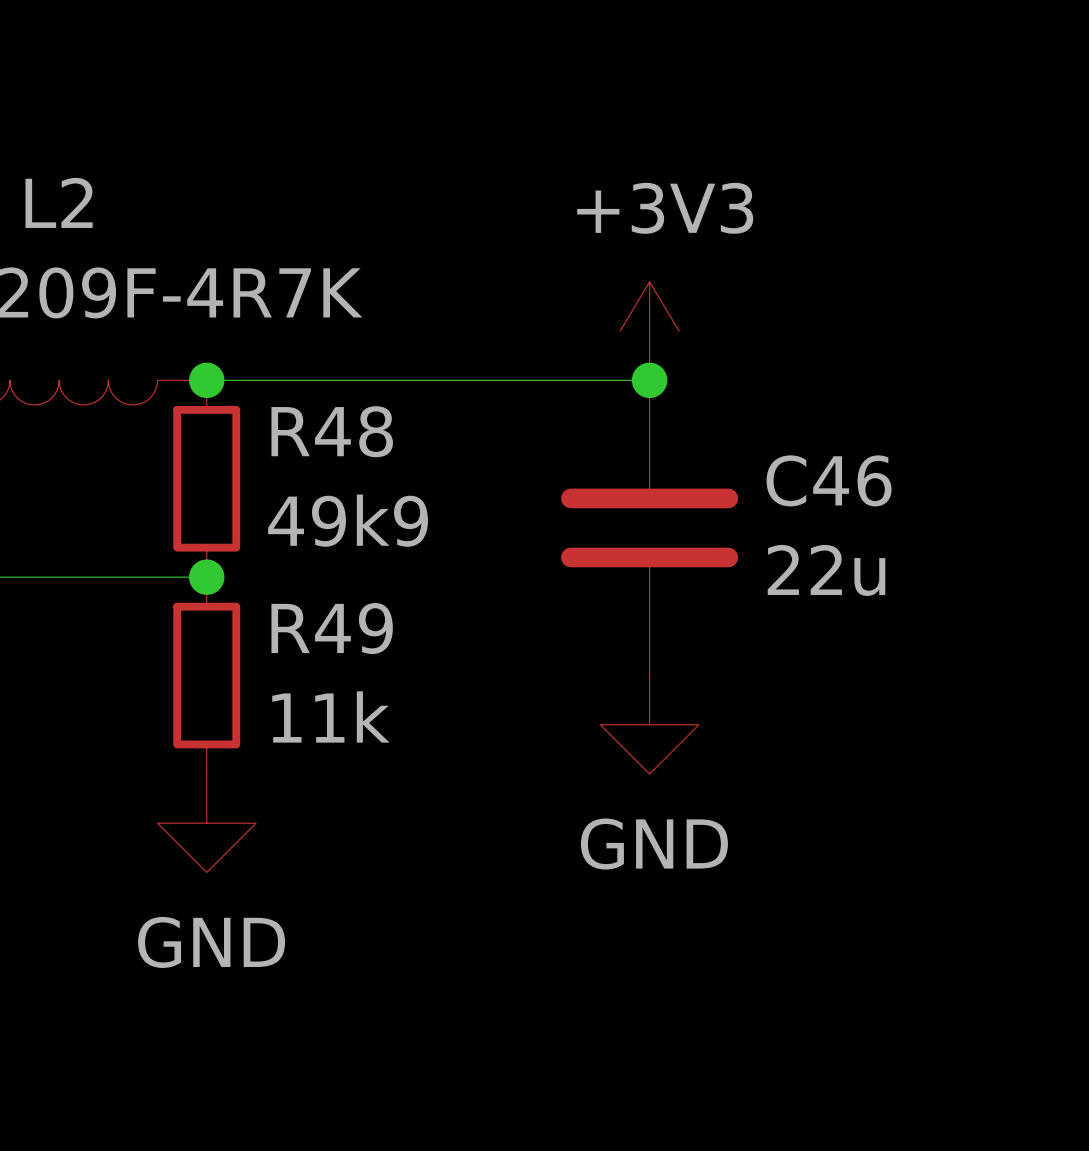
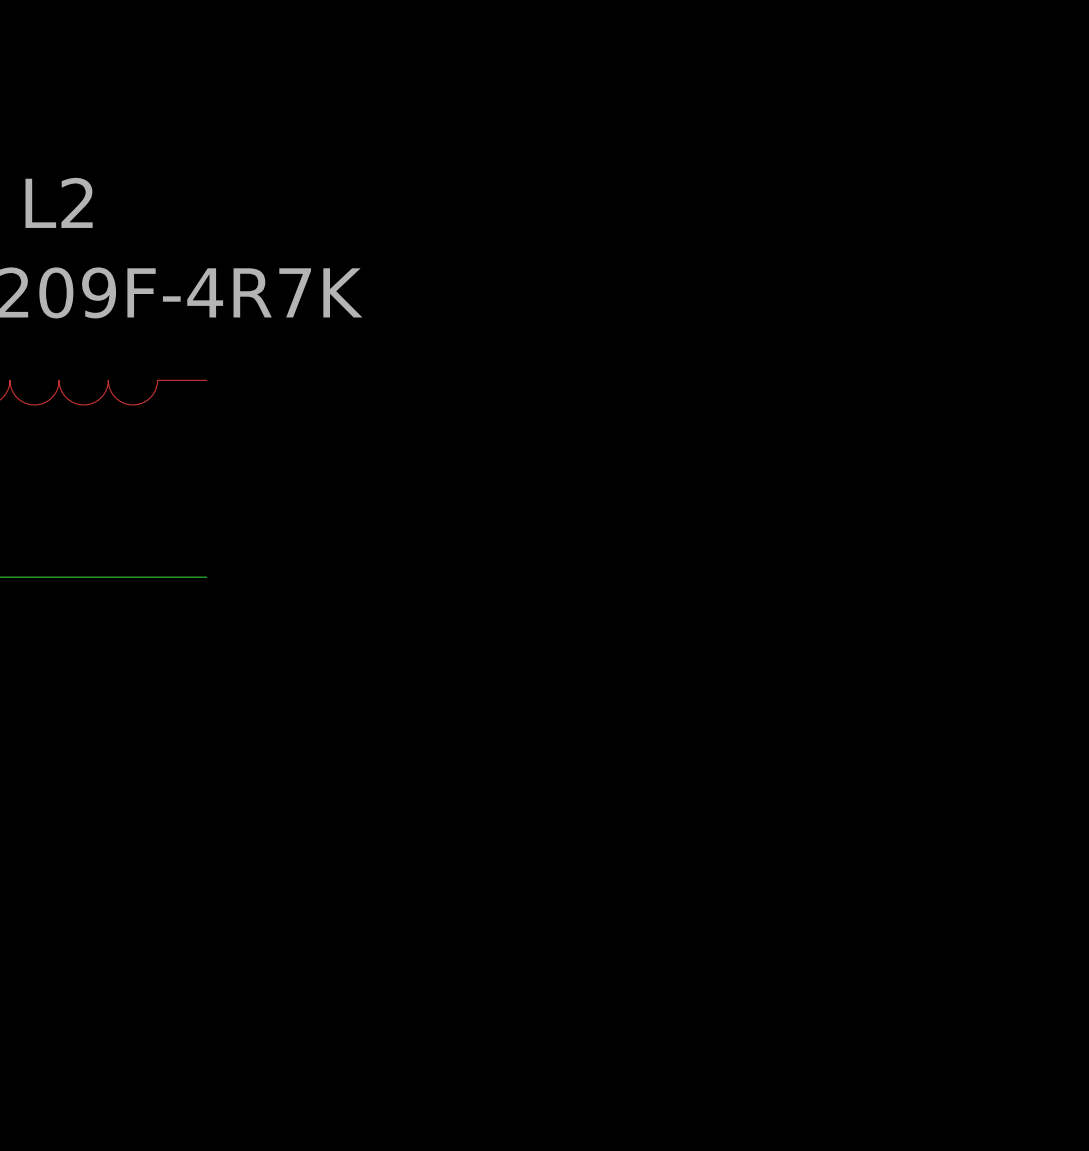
power symbol: +3V3 (649, 331) -> none
wire: (206, 380) (649, 380) -> none
junction: (206, 380) -> none
junction: (649, 380) -> none
R48: 49k9 (206, 478) -> none
C46: 22u (649, 527) -> none
junction: (206, 577) -> none
R49: 11k (206, 675) -> none
power symbol: GND (649, 724) -> none
power symbol: GND (206, 823) -> none

